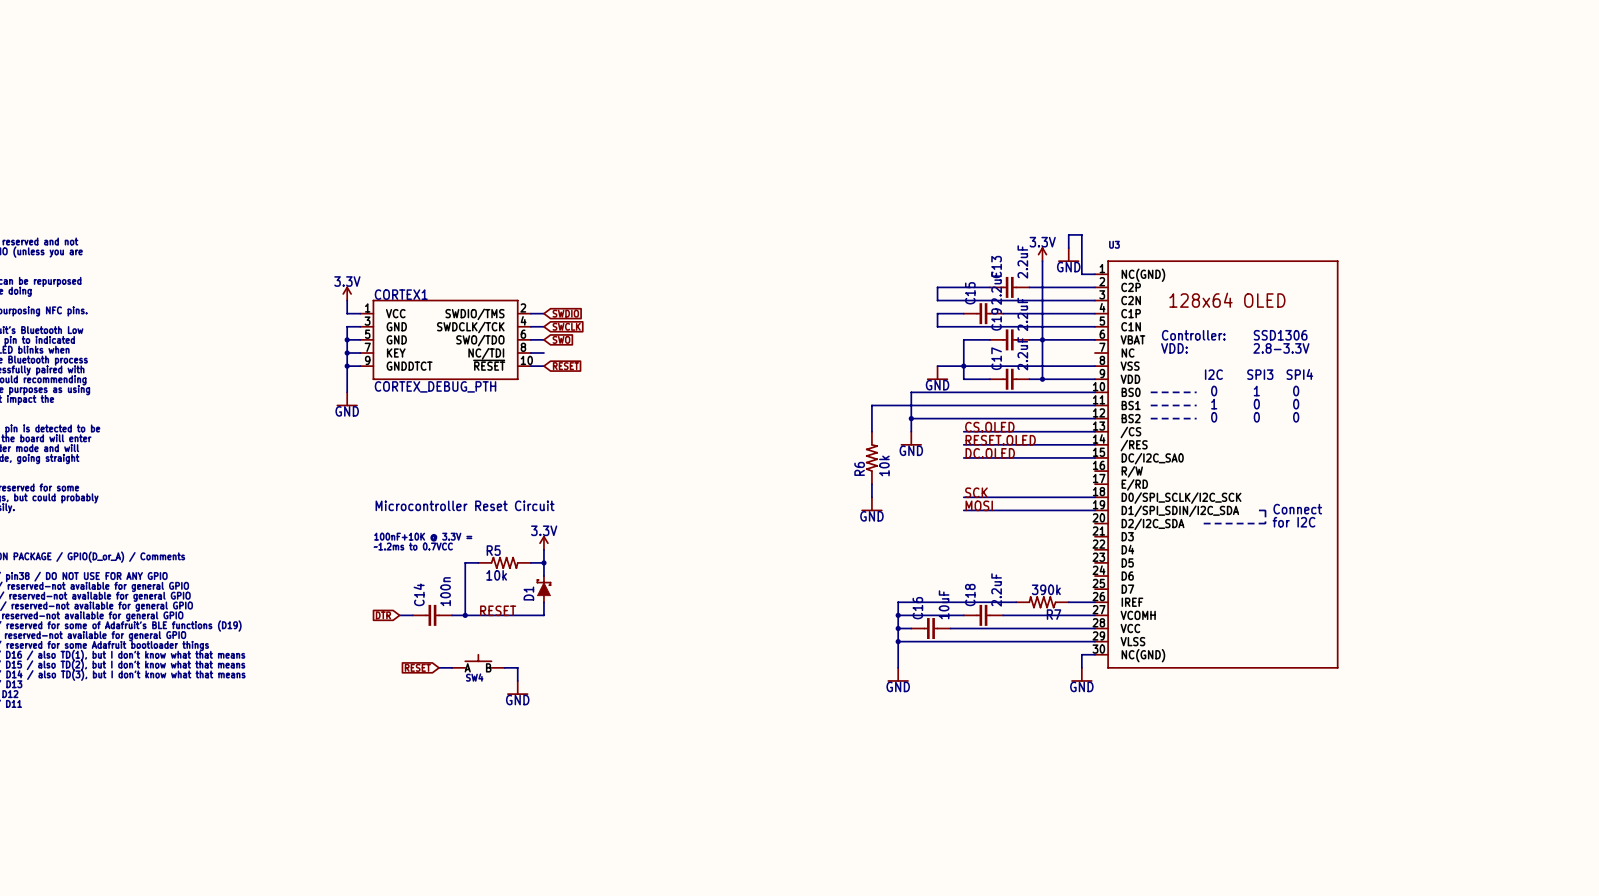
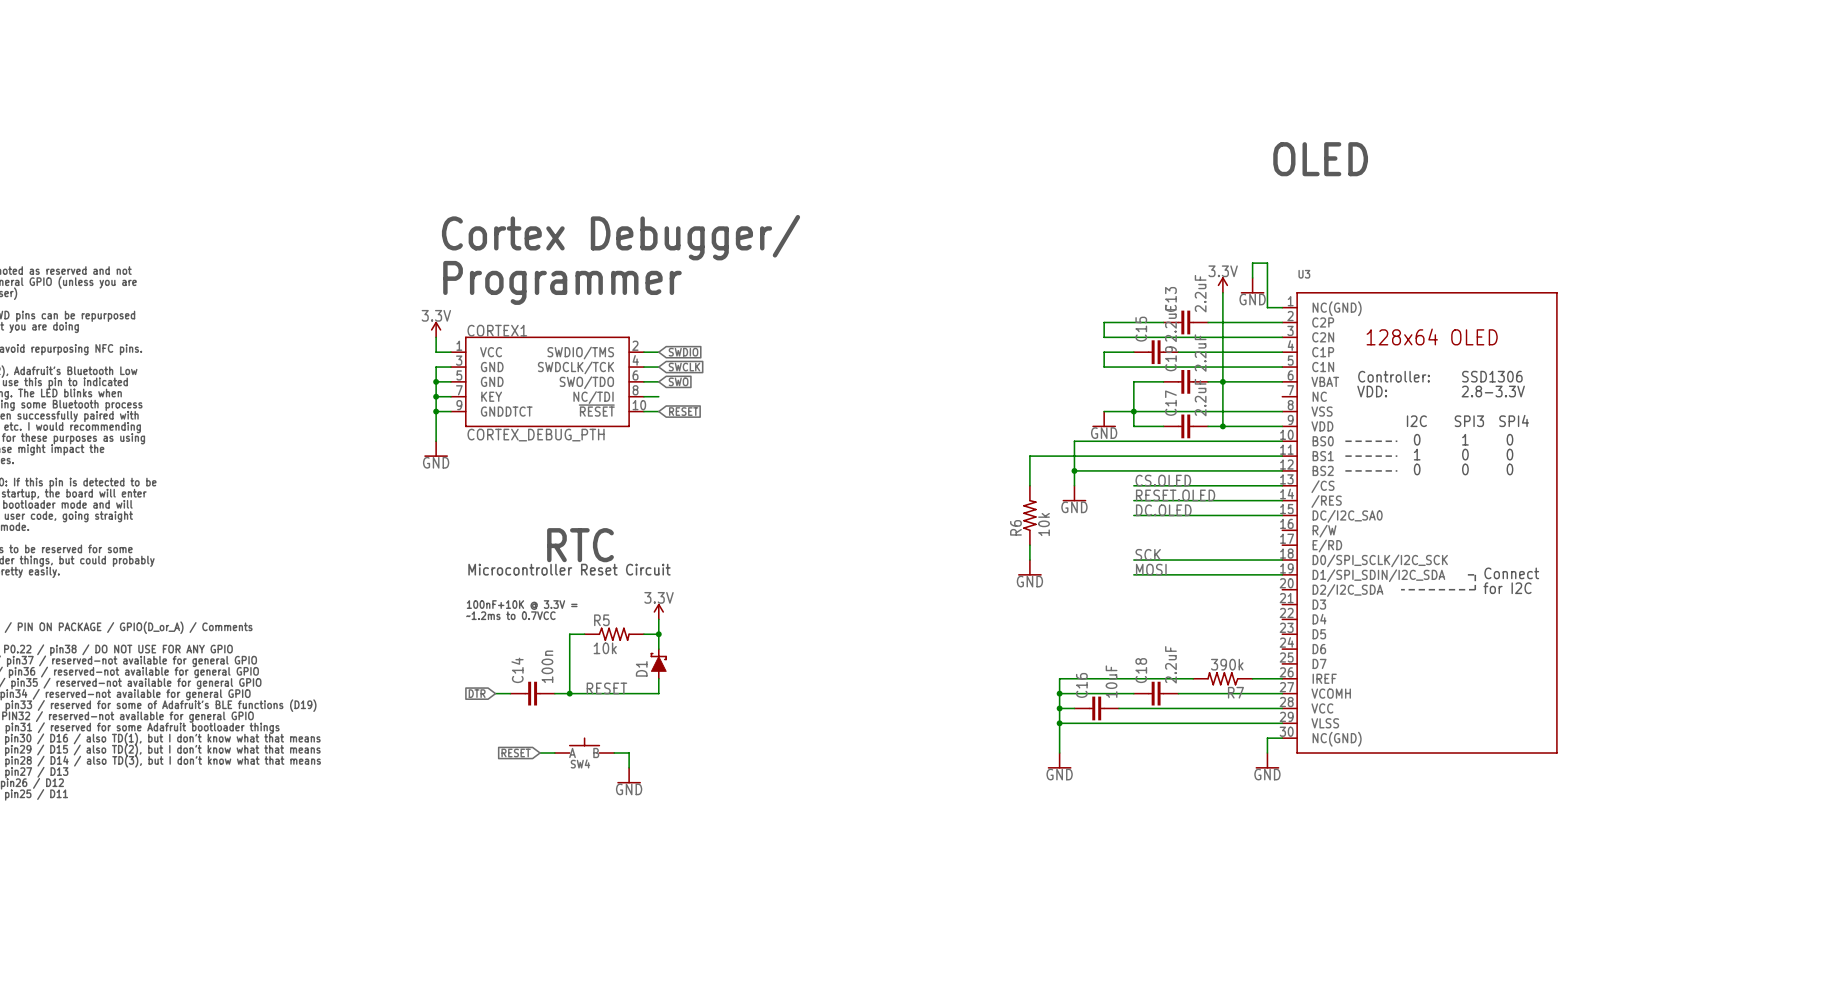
text: none -> OLED (1320, 159)
text: none -> Cortex Debugger/ (621, 237)
text: none -> Programmer (562, 282)
text: none -> RTC (580, 545)

